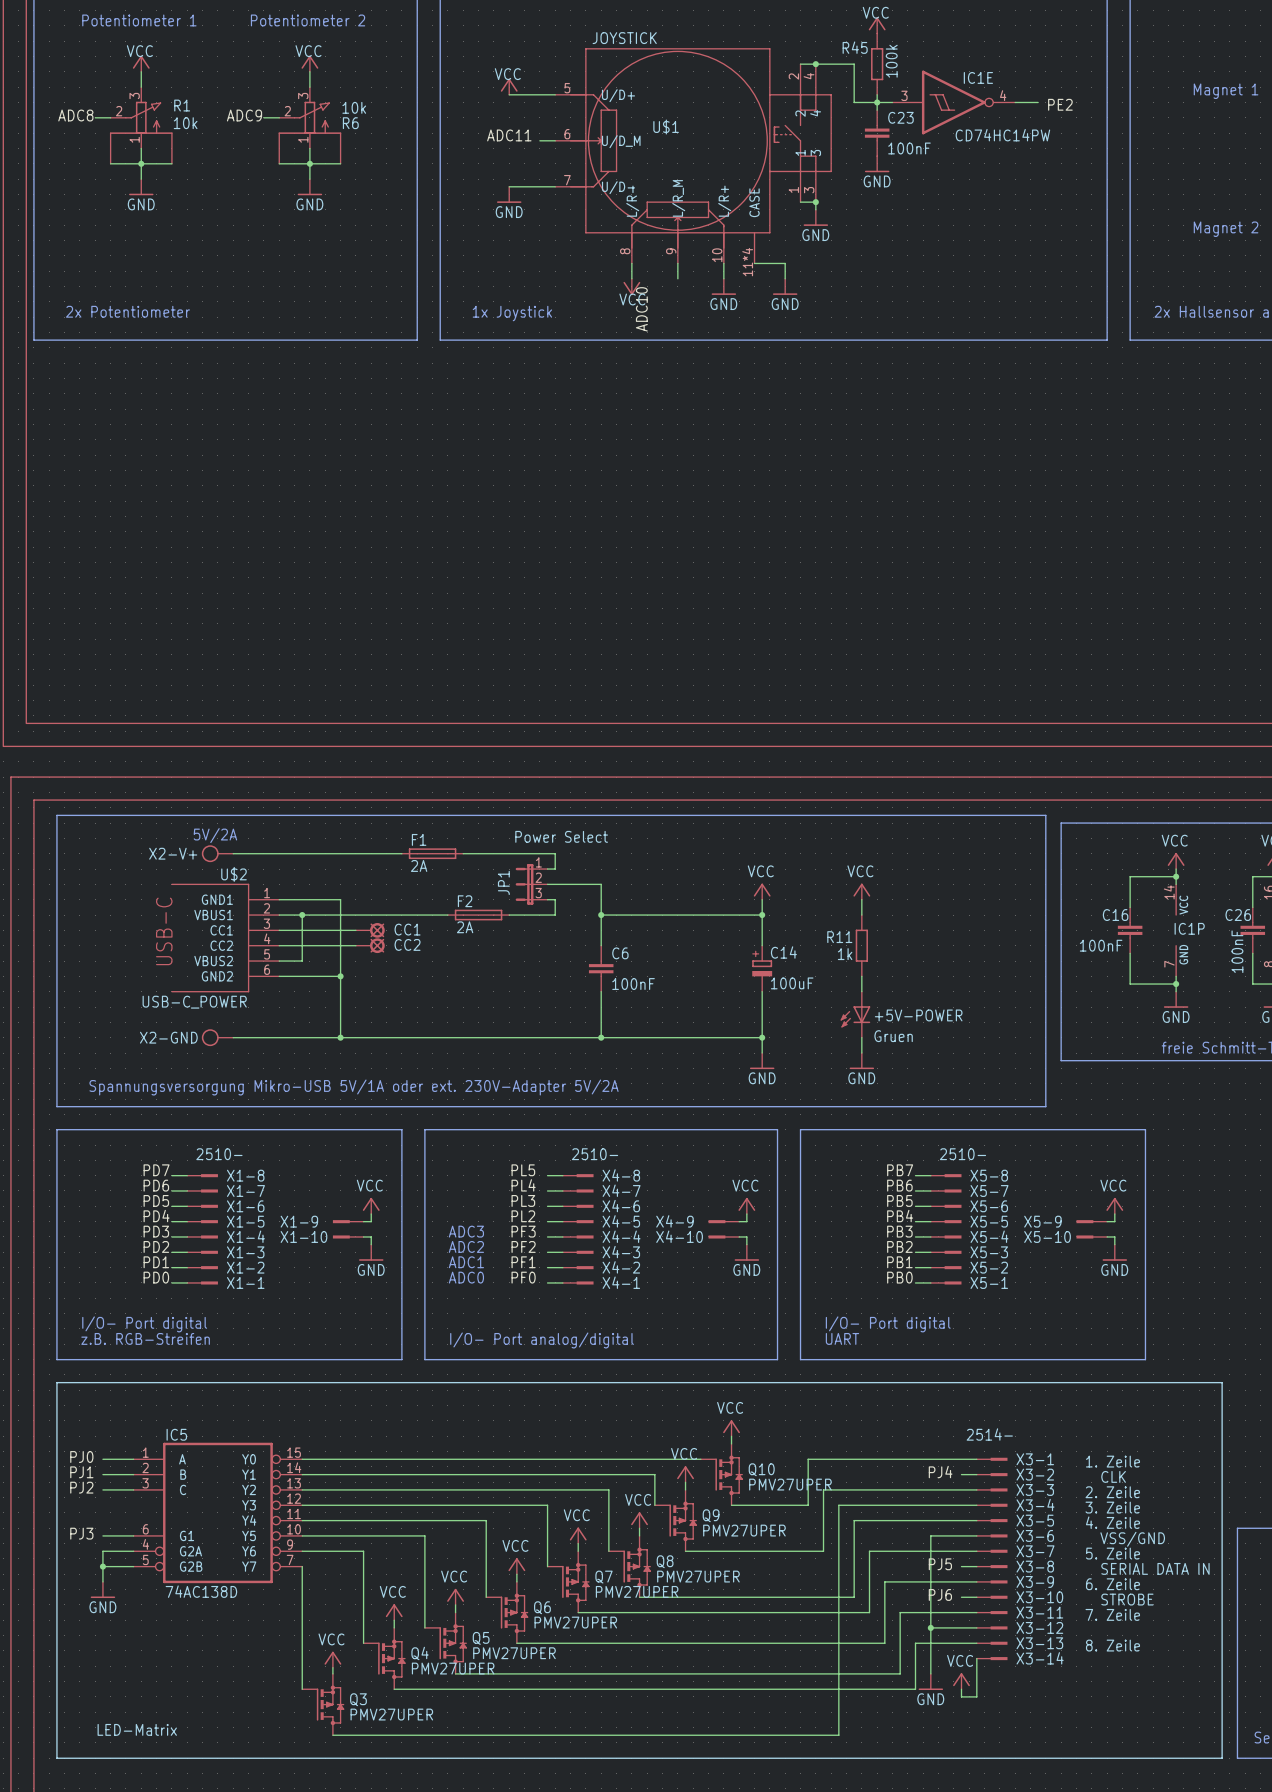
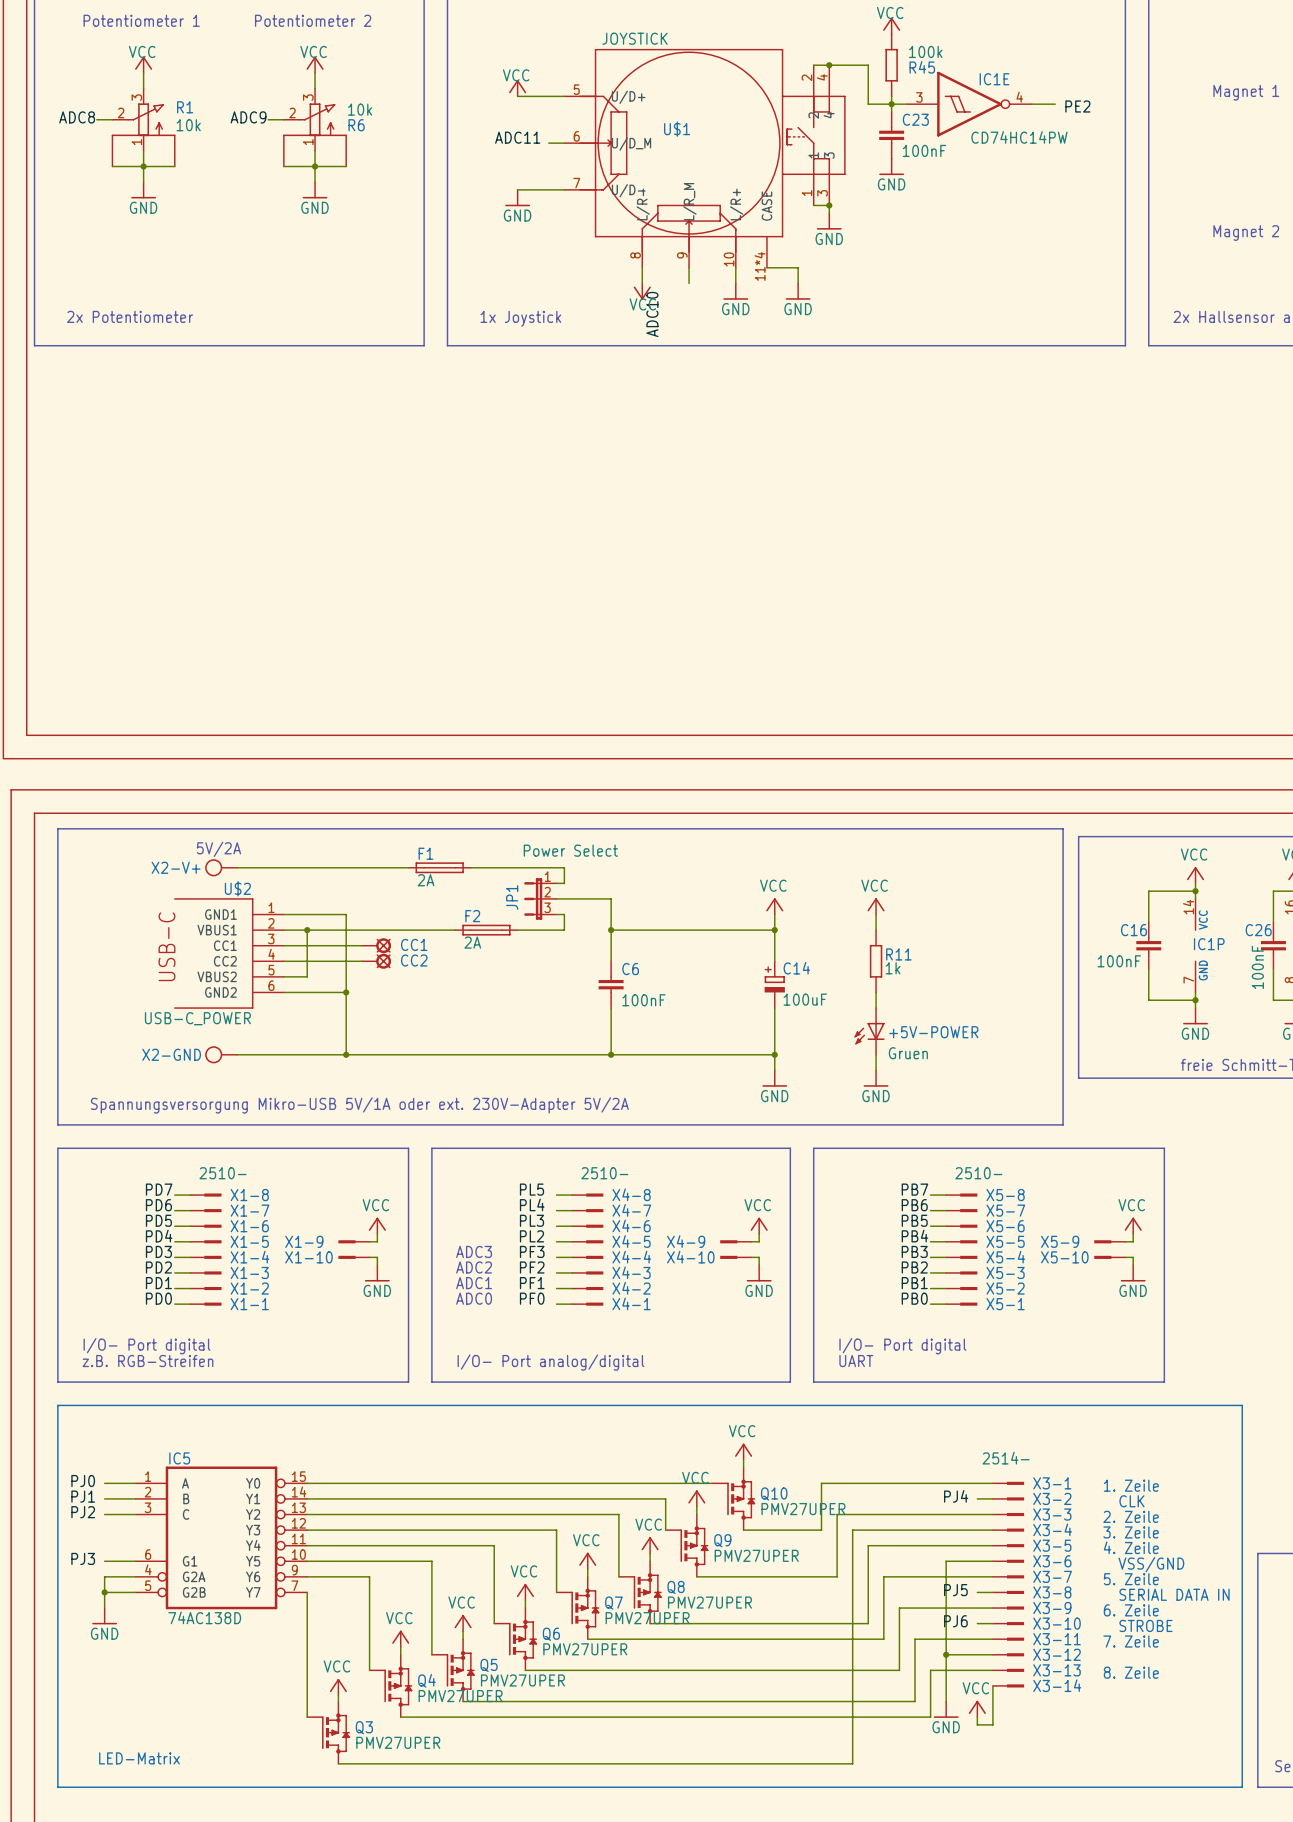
R45 name position: R45 (855, 47) -> R45 (922, 67)
R45 value rotation: 0° (891, 61) -> 90° clockwise (925, 51)
R11 name position: R11 (839, 937) -> R11 (898, 954)
R11 value position: 1k (845, 954) -> 1k (893, 968)

